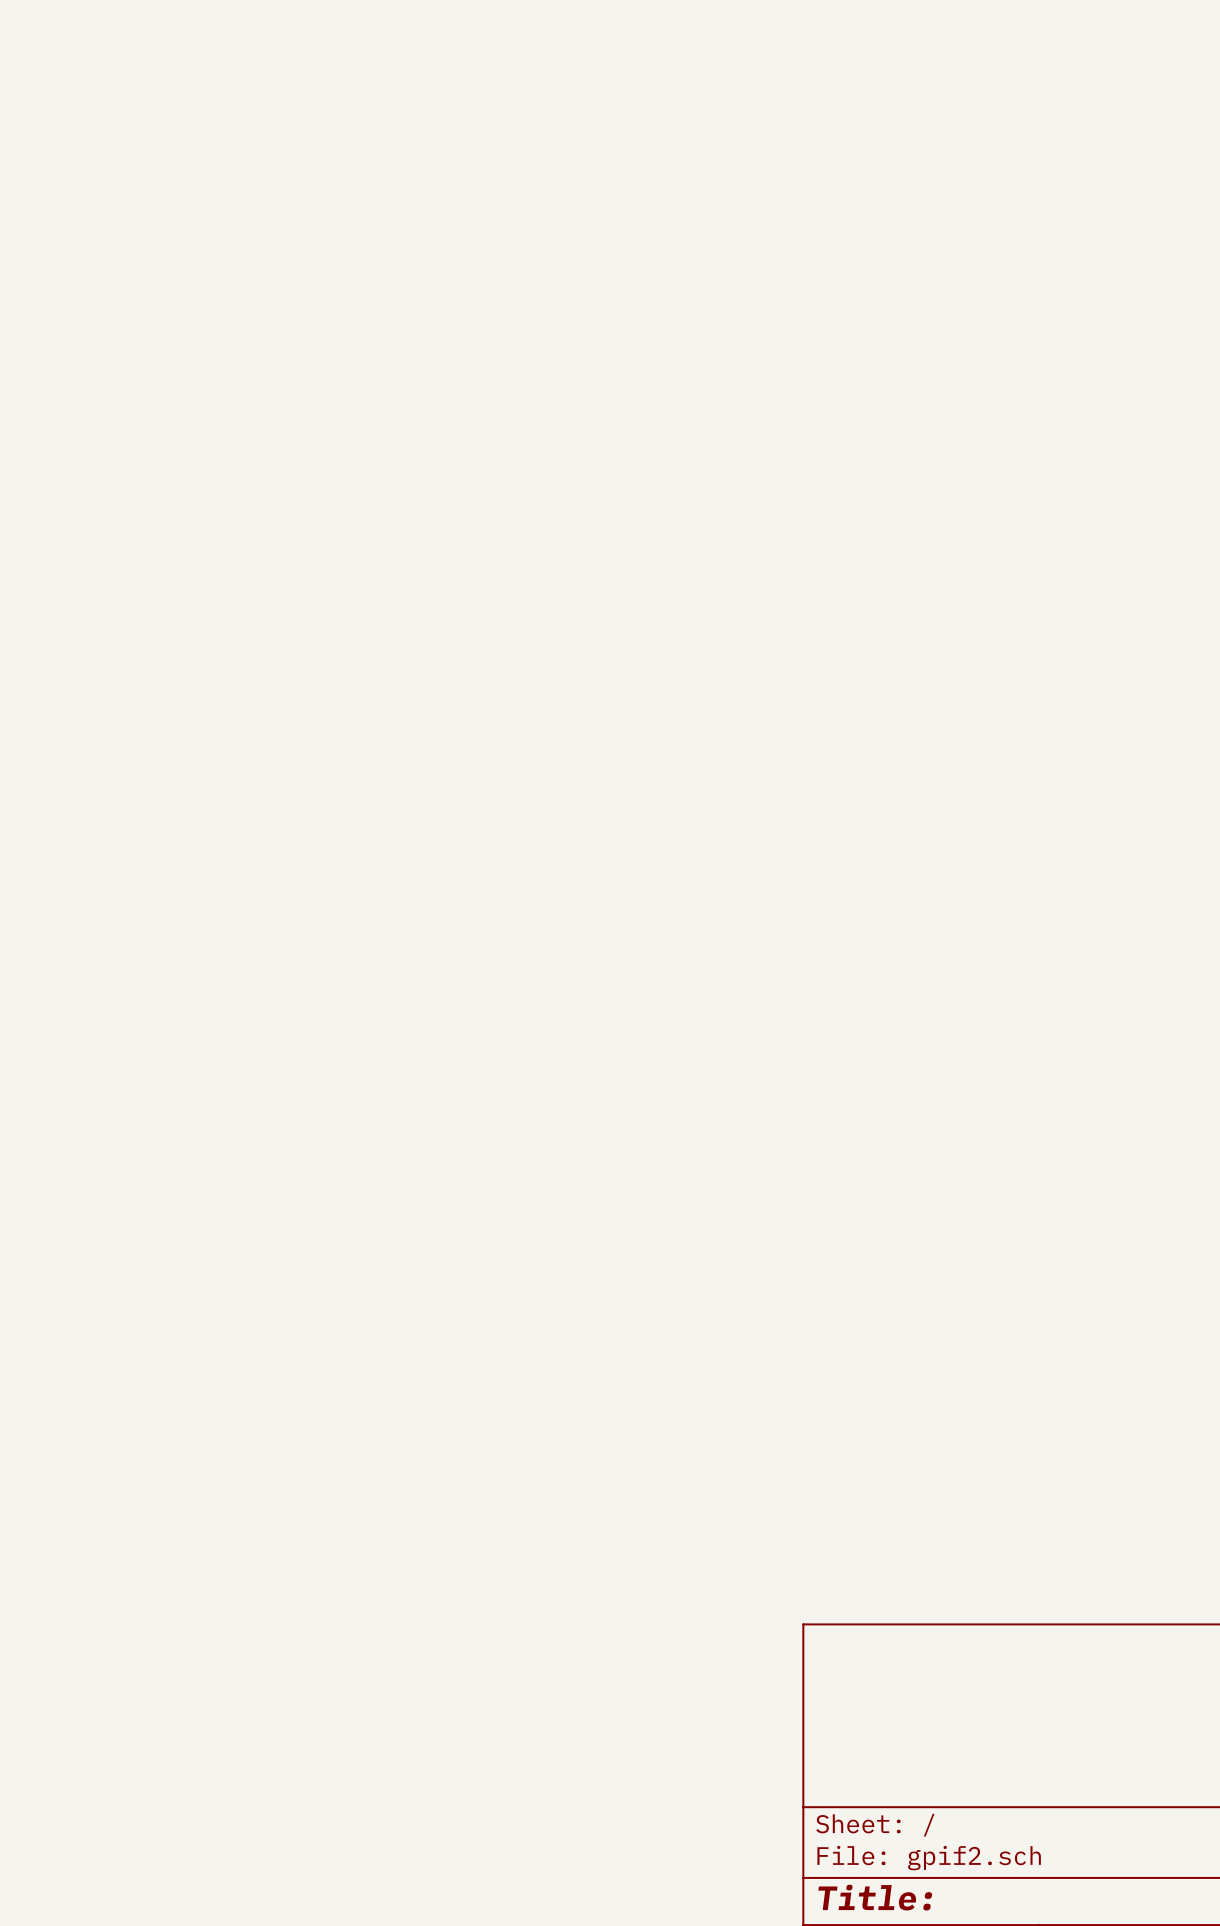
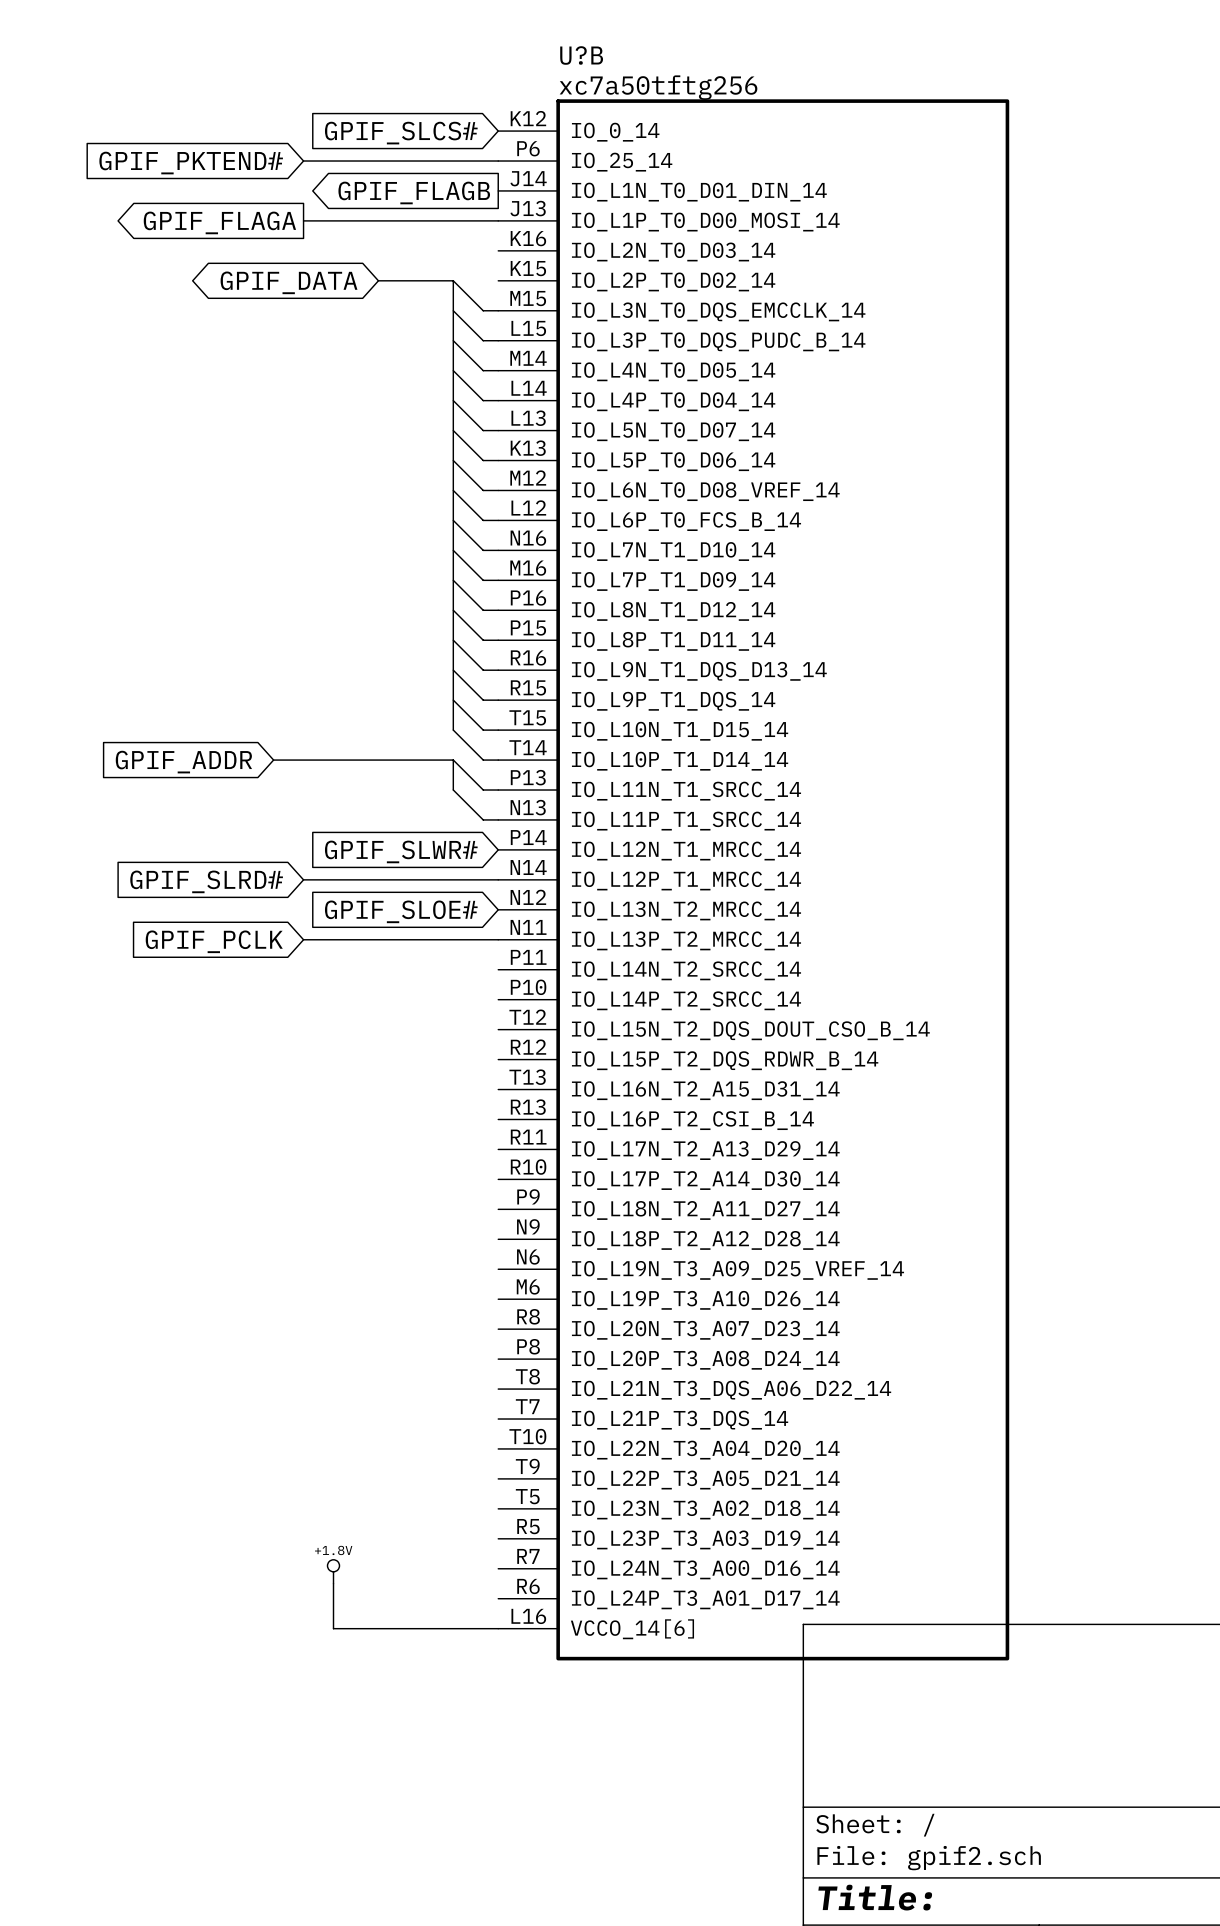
global label: none -> GPIF_SLCS# (401, 133)
wire: none -> (303, 161) (498, 161)
global label: none -> GPIF_PKTEND# (191, 163)
global label: none -> GPIF_FLAGB (414, 192)
wire: none -> (303, 220) (498, 220)
global label: none -> GPIF_FLAGA (219, 222)
bus: none -> (378, 280) (453, 280) (453, 730)
wire: none -> (453, 280) (483, 310) (498, 310)
global label: none -> GPIF_DATA (289, 282)
wire: none -> (453, 310) (483, 340) (498, 340)
wire: none -> (453, 340) (483, 370) (498, 370)
wire: none -> (453, 370) (483, 400) (498, 400)
wire: none -> (453, 400) (483, 430) (498, 430)
wire: none -> (453, 430) (483, 460) (498, 460)
wire: none -> (453, 460) (483, 490) (498, 490)
wire: none -> (453, 490) (483, 520) (498, 520)
wire: none -> (453, 520) (483, 550) (498, 550)
wire: none -> (453, 550) (483, 580) (498, 580)
wire: none -> (453, 580) (483, 610) (498, 610)
wire: none -> (453, 610) (483, 640) (498, 640)
wire: none -> (453, 640) (483, 670) (498, 670)
wire: none -> (453, 670) (483, 700) (498, 700)
wire: none -> (453, 700) (483, 730) (498, 730)
wire: none -> (453, 730) (483, 760) (498, 760)
bus: none -> (273, 760) (453, 760) (453, 790)
wire: none -> (453, 760) (483, 790) (498, 790)
global label: none -> GPIF_ADDR (183, 762)
wire: none -> (453, 790) (483, 819) (498, 819)
global label: none -> GPIF_SLWR# (401, 851)
wire: none -> (303, 879) (498, 879)
U?B: none -> xc7a50tftg256 (753, 879)
global label: none -> GPIF_SLRD# (206, 881)
global label: none -> GPIF_SLOE# (401, 911)
wire: none -> (303, 939) (498, 939)
global label: none -> GPIF_PCLK (214, 941)
power symbol: none -> +1.8V (333, 1571)
wire: none -> (333, 1583) (333, 1628) (498, 1628)

